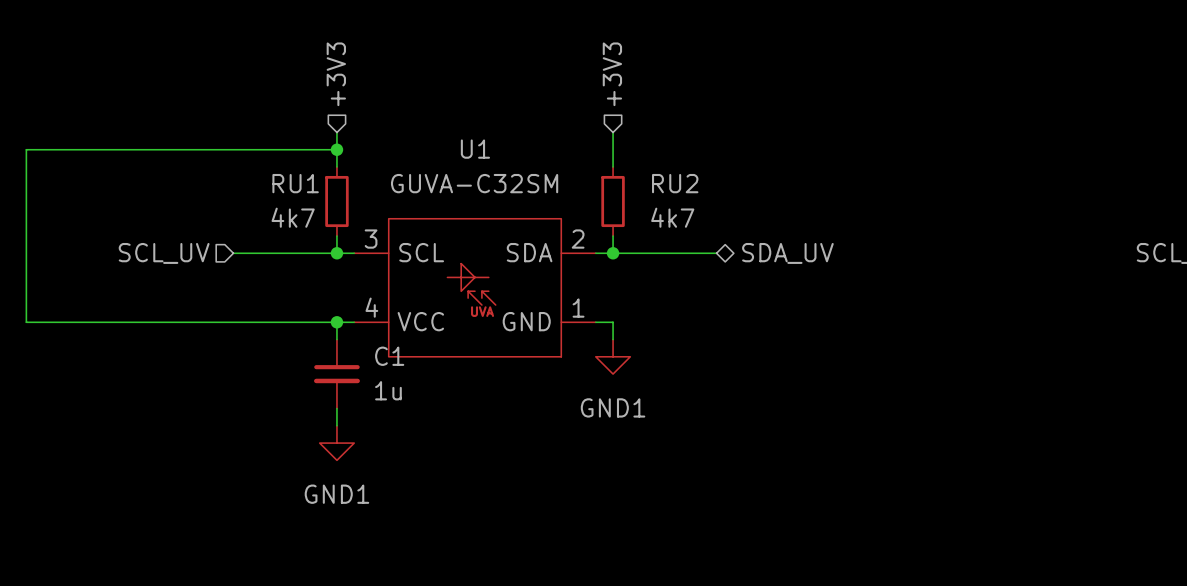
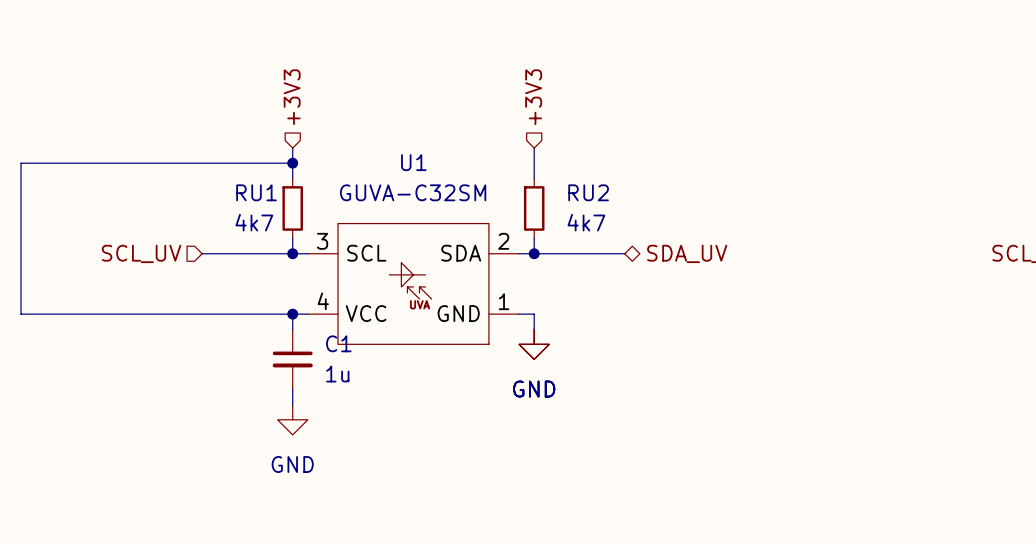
power symbol: GND1 (613, 356) -> GND (534, 344)
power symbol: GND1 (336, 443) -> GND (292, 419)

